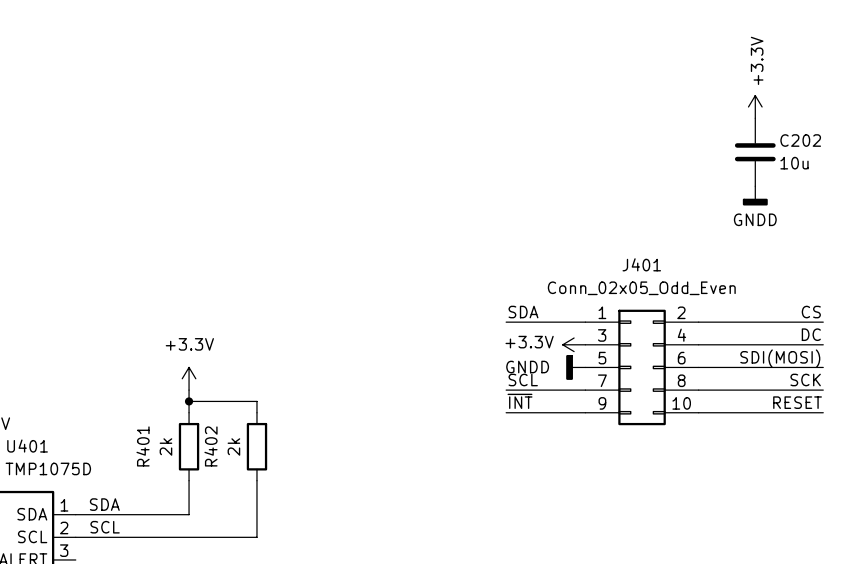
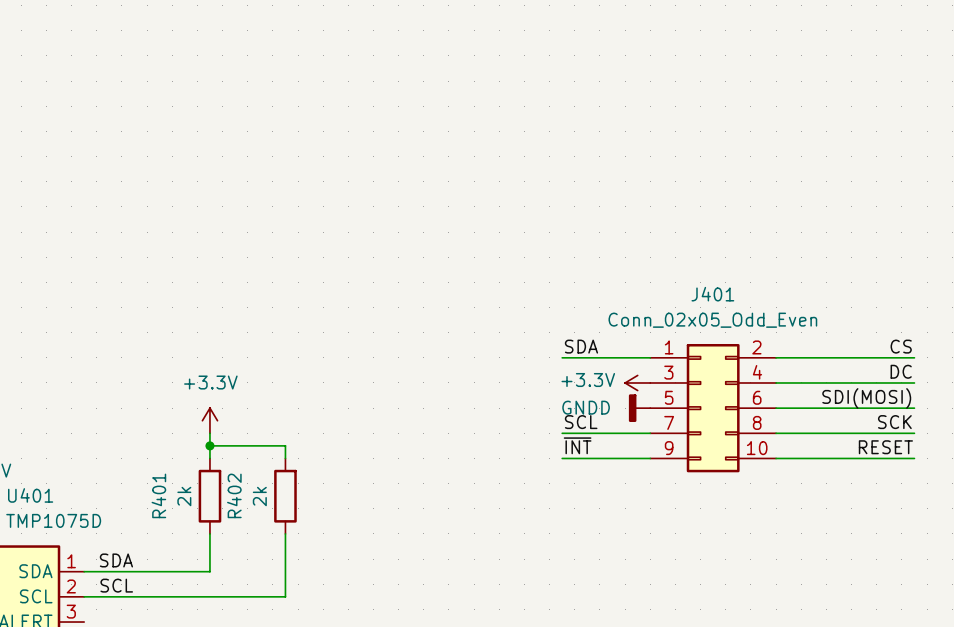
power symbol: +3.3V (755, 106) -> none
C202: 10u (755, 152) -> none
power symbol: GNDD (755, 195) -> none

